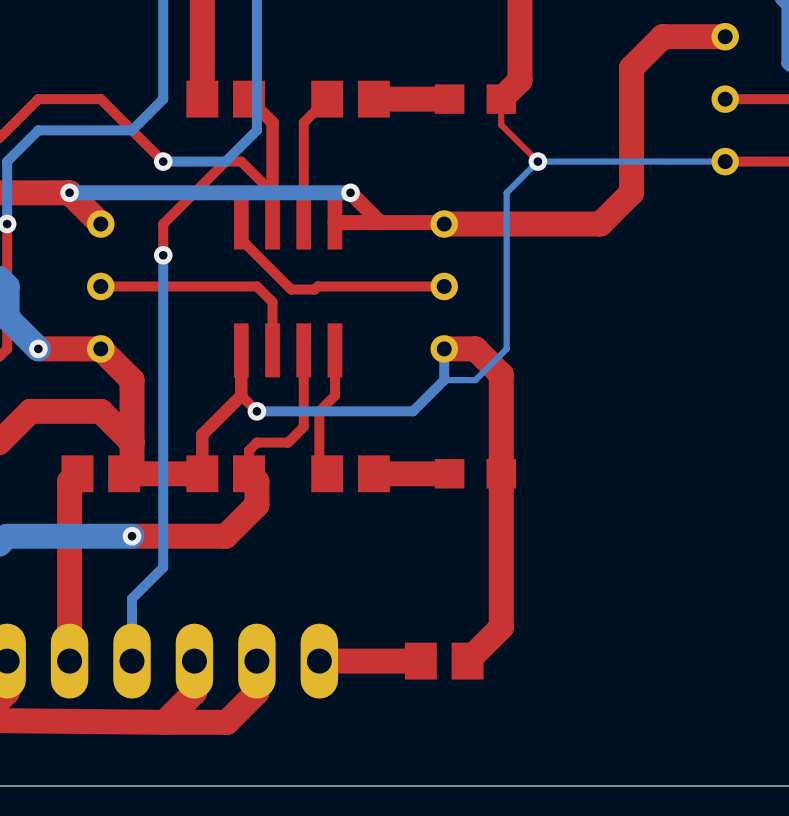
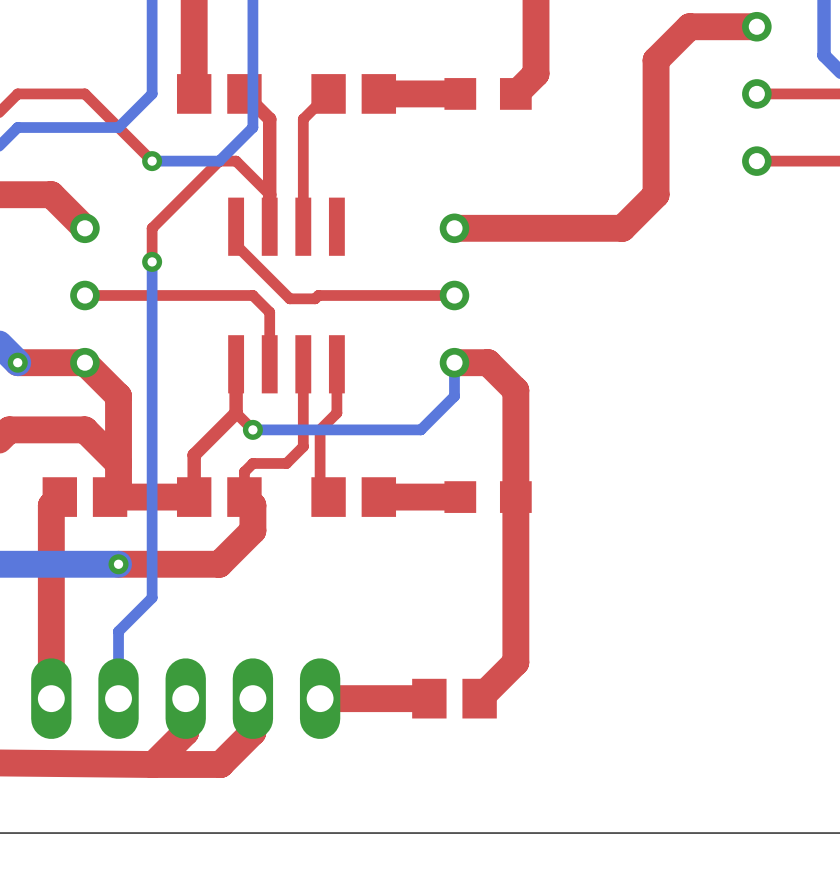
top track: (501, 99) (501, 124) (537, 161) -> none
via: (537, 161) -> none
bottom track: (725, 161) (537, 161) (506, 192) (506, 348) (475, 380) (444, 380) -> none
via: (69, 192) -> none
top track: (350, 192) (380, 222) -> none
bottom track: (350, 192) (69, 192) -> none
via: (350, 192) -> none
top track: (334, 222) (444, 224) -> none

